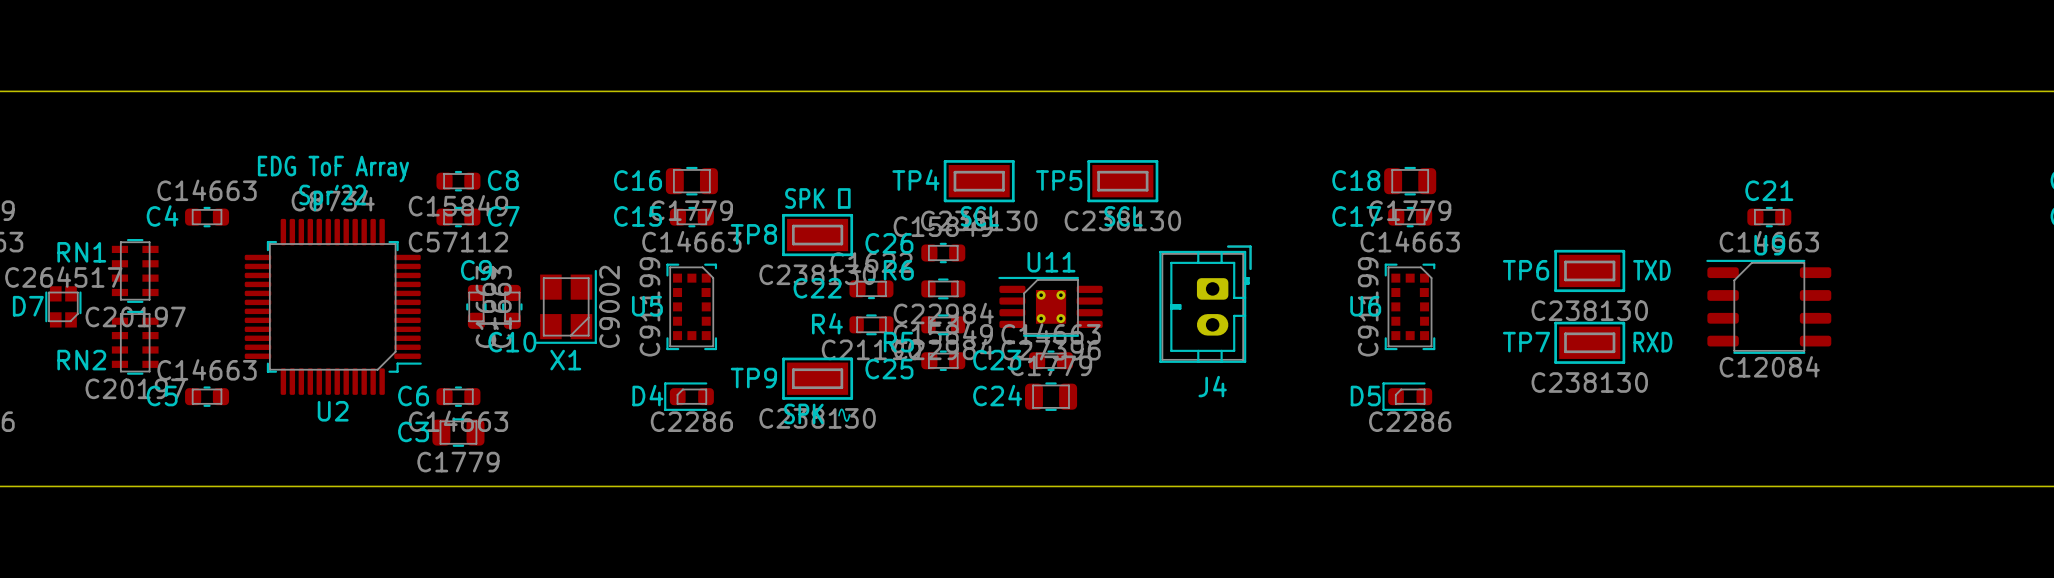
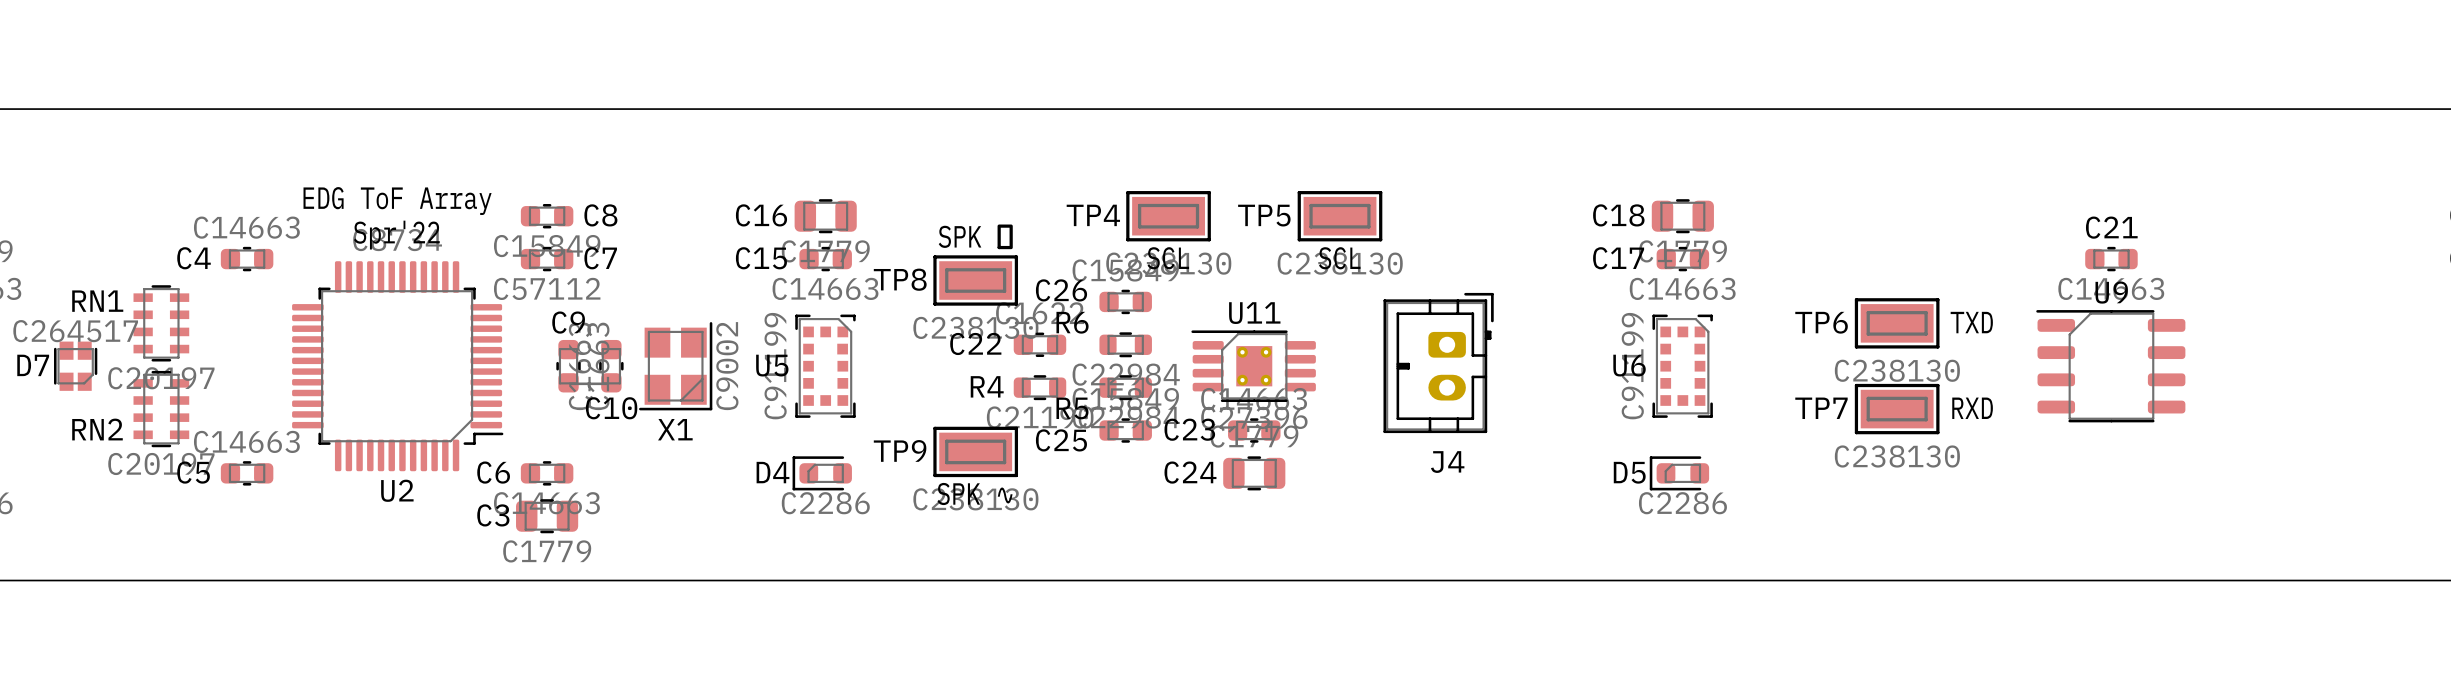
U9 value: C12084 (1769, 366) -> none

